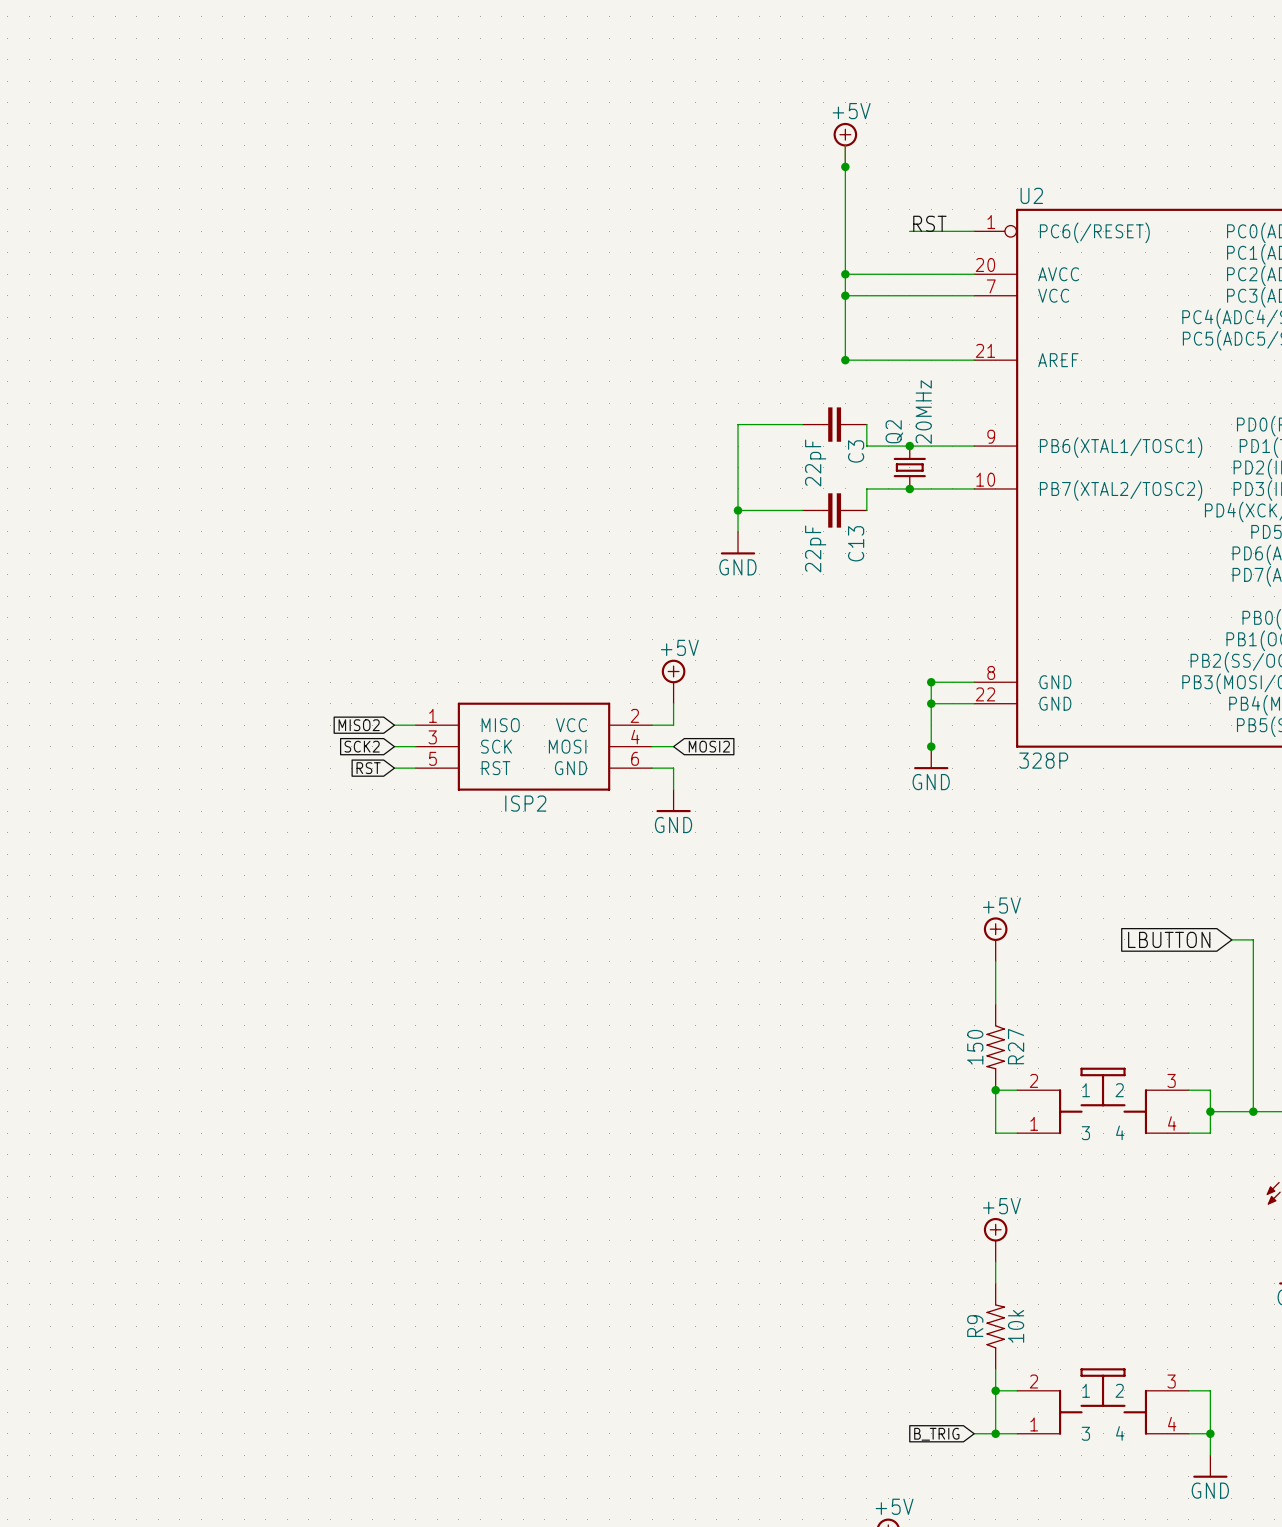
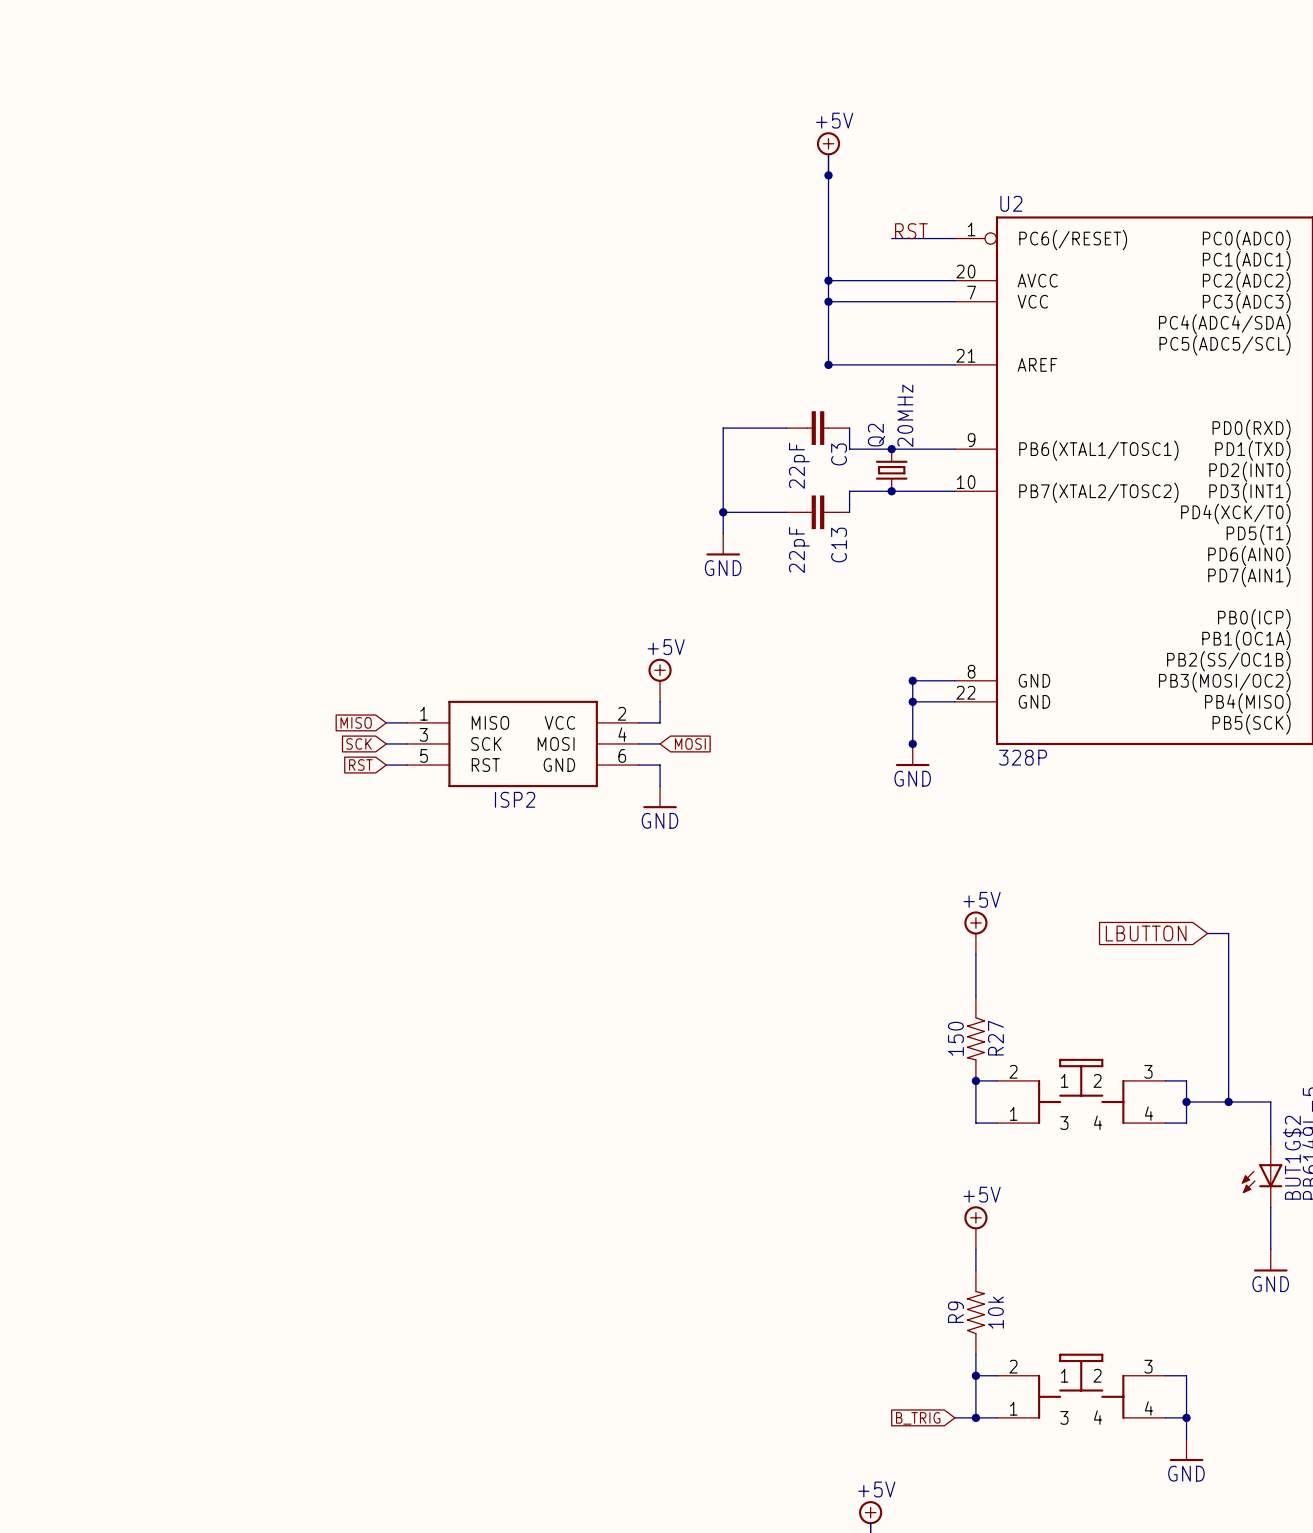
global label: MISO2 (359, 725) -> MISO (356, 722)
global label: SCK2 (362, 746) -> SCK (359, 743)
global label: MOSI2 (709, 746) -> MOSI (690, 743)

